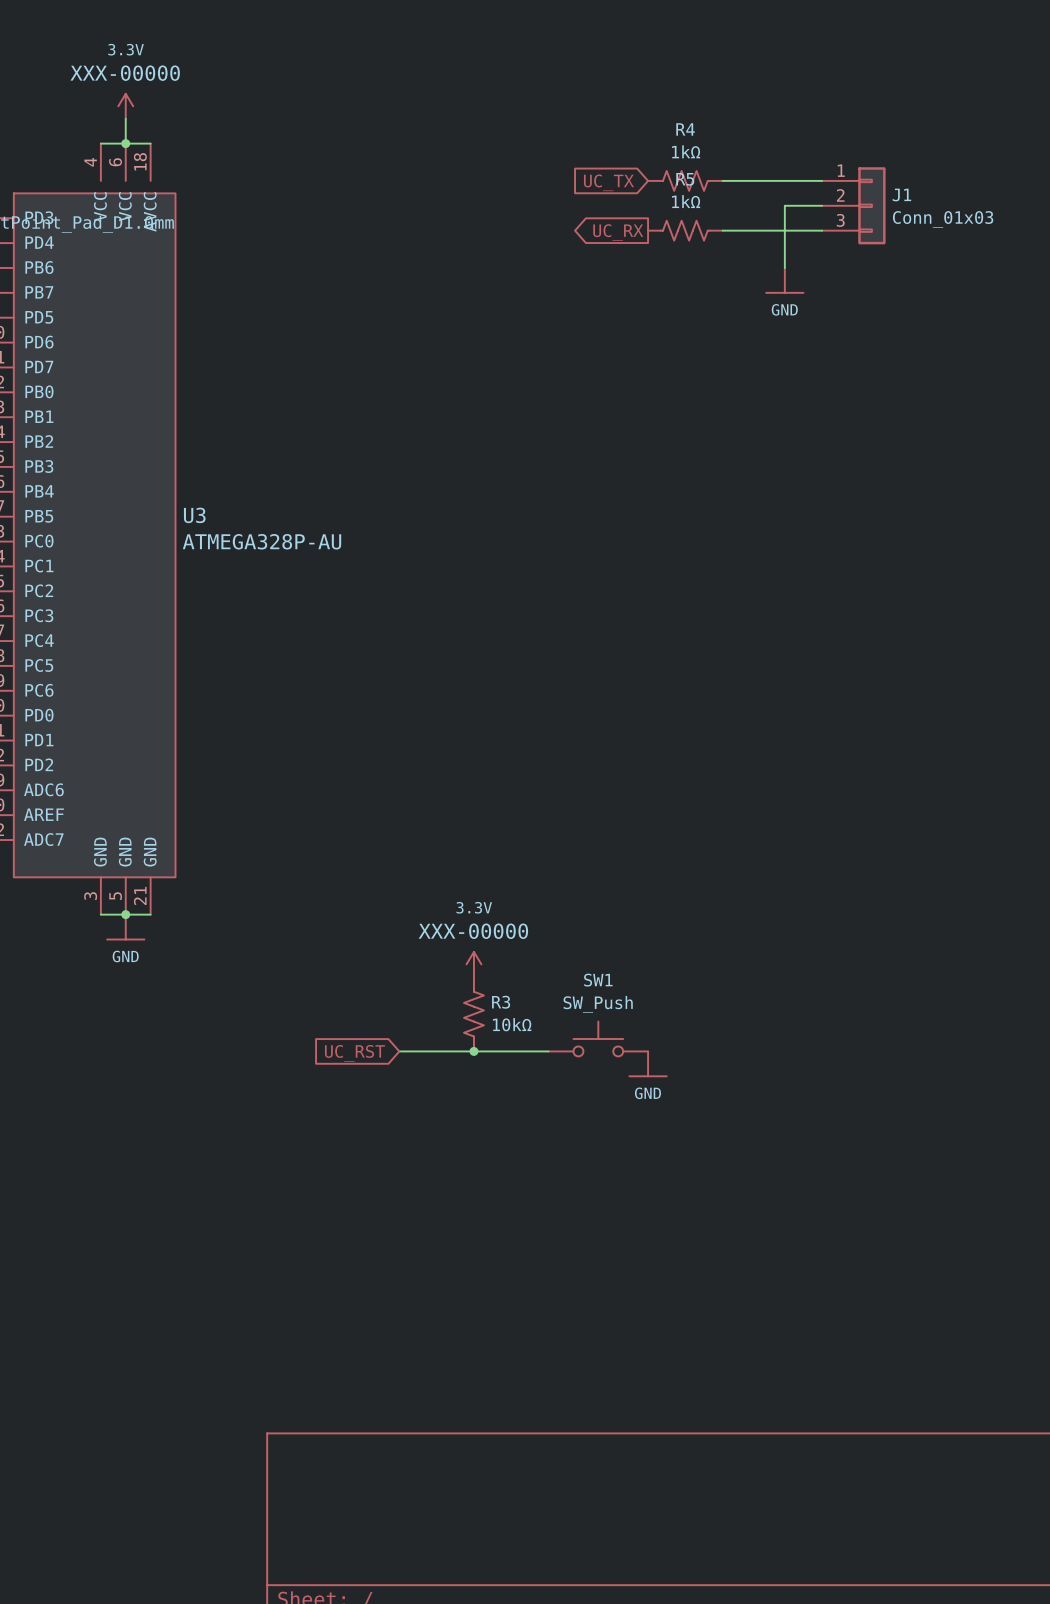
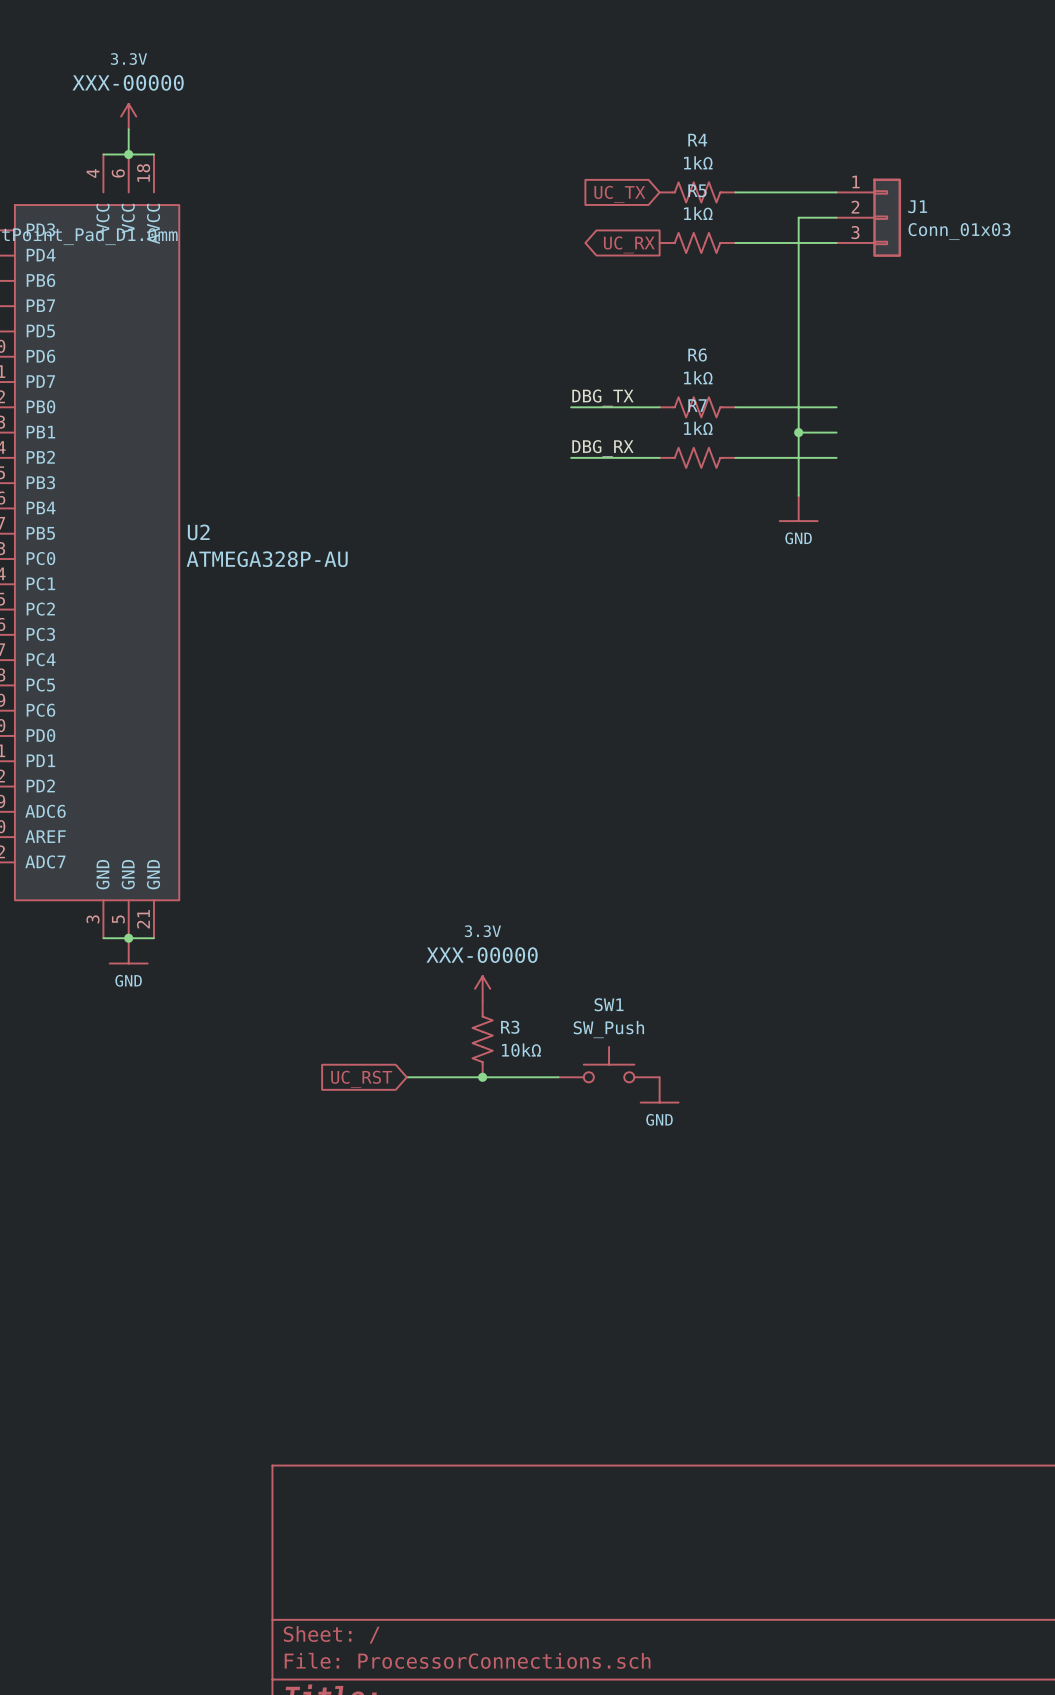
wire: none -> (798, 280) (798, 495)
power symbol position: GND (784, 280) -> GND (798, 508)
label: none -> DBG_TX (602, 397)
wire: none -> (571, 407) (659, 407)
R6: none -> 1kΩ (697, 407)
wire: none -> (735, 407) (836, 407)
wire: none -> (798, 432) (836, 432)
junction: none -> (798, 432)
label: none -> DBG_RX (602, 448)
wire: none -> (571, 457) (659, 457)
R7: none -> 1kΩ (697, 457)
wire: none -> (735, 457) (836, 457)
U3 name: U3 (194, 515) -> U2 (198, 532)

